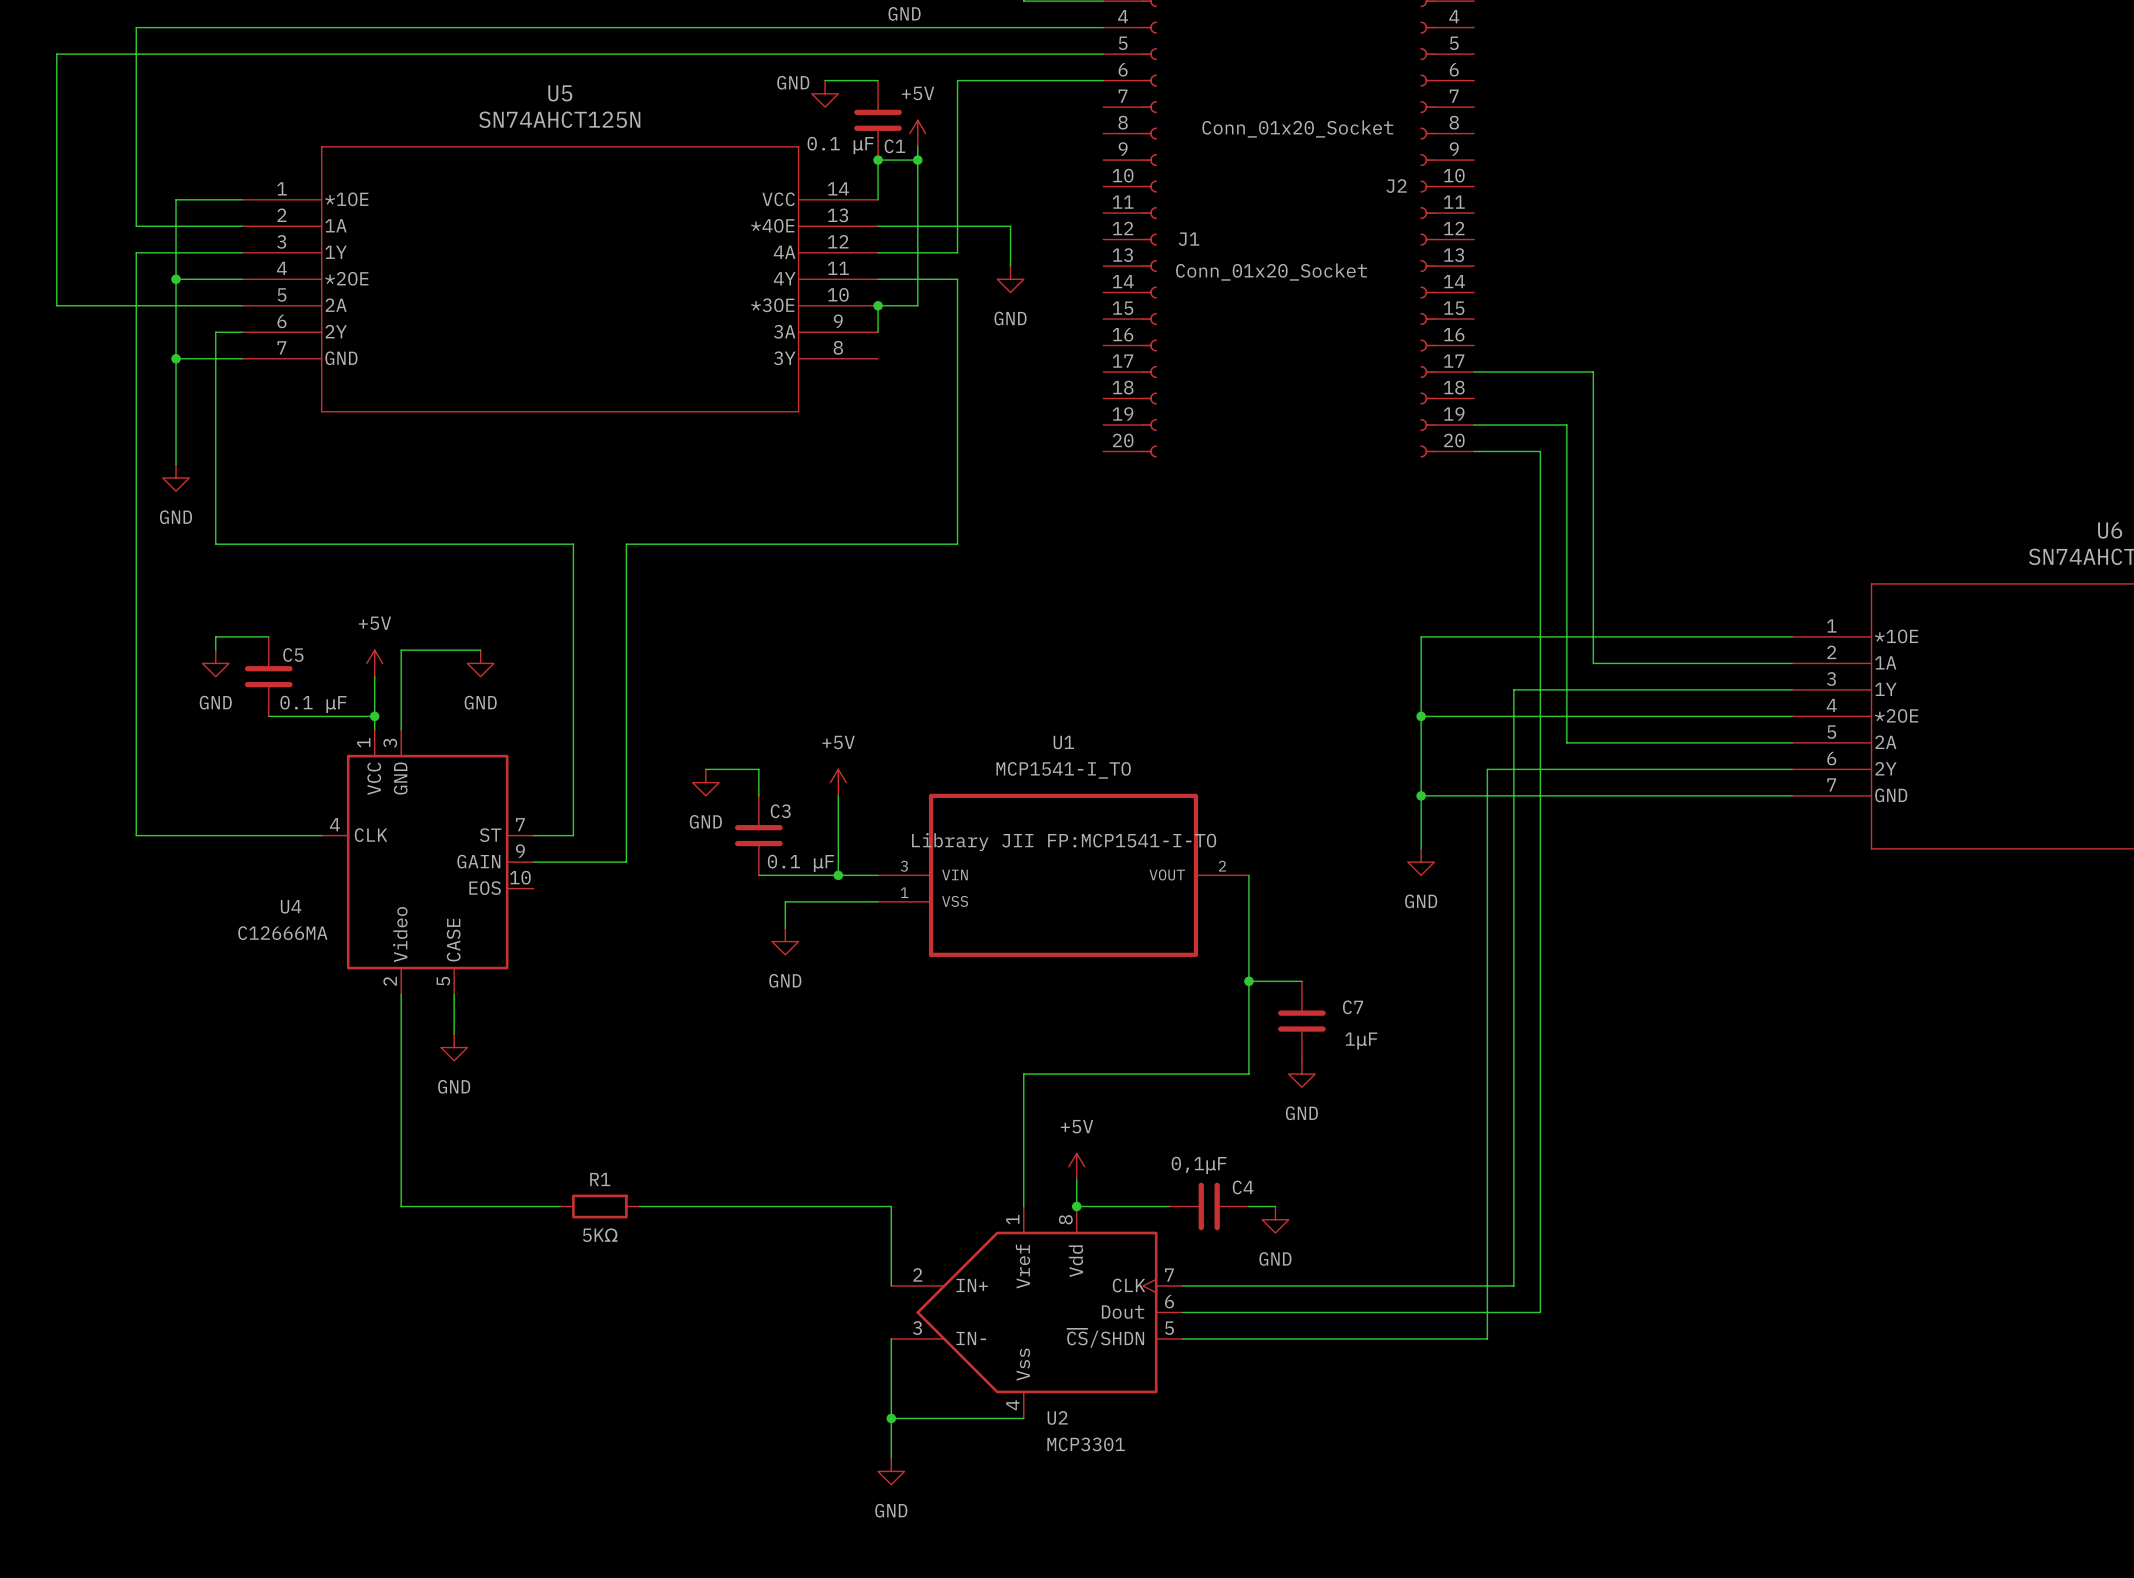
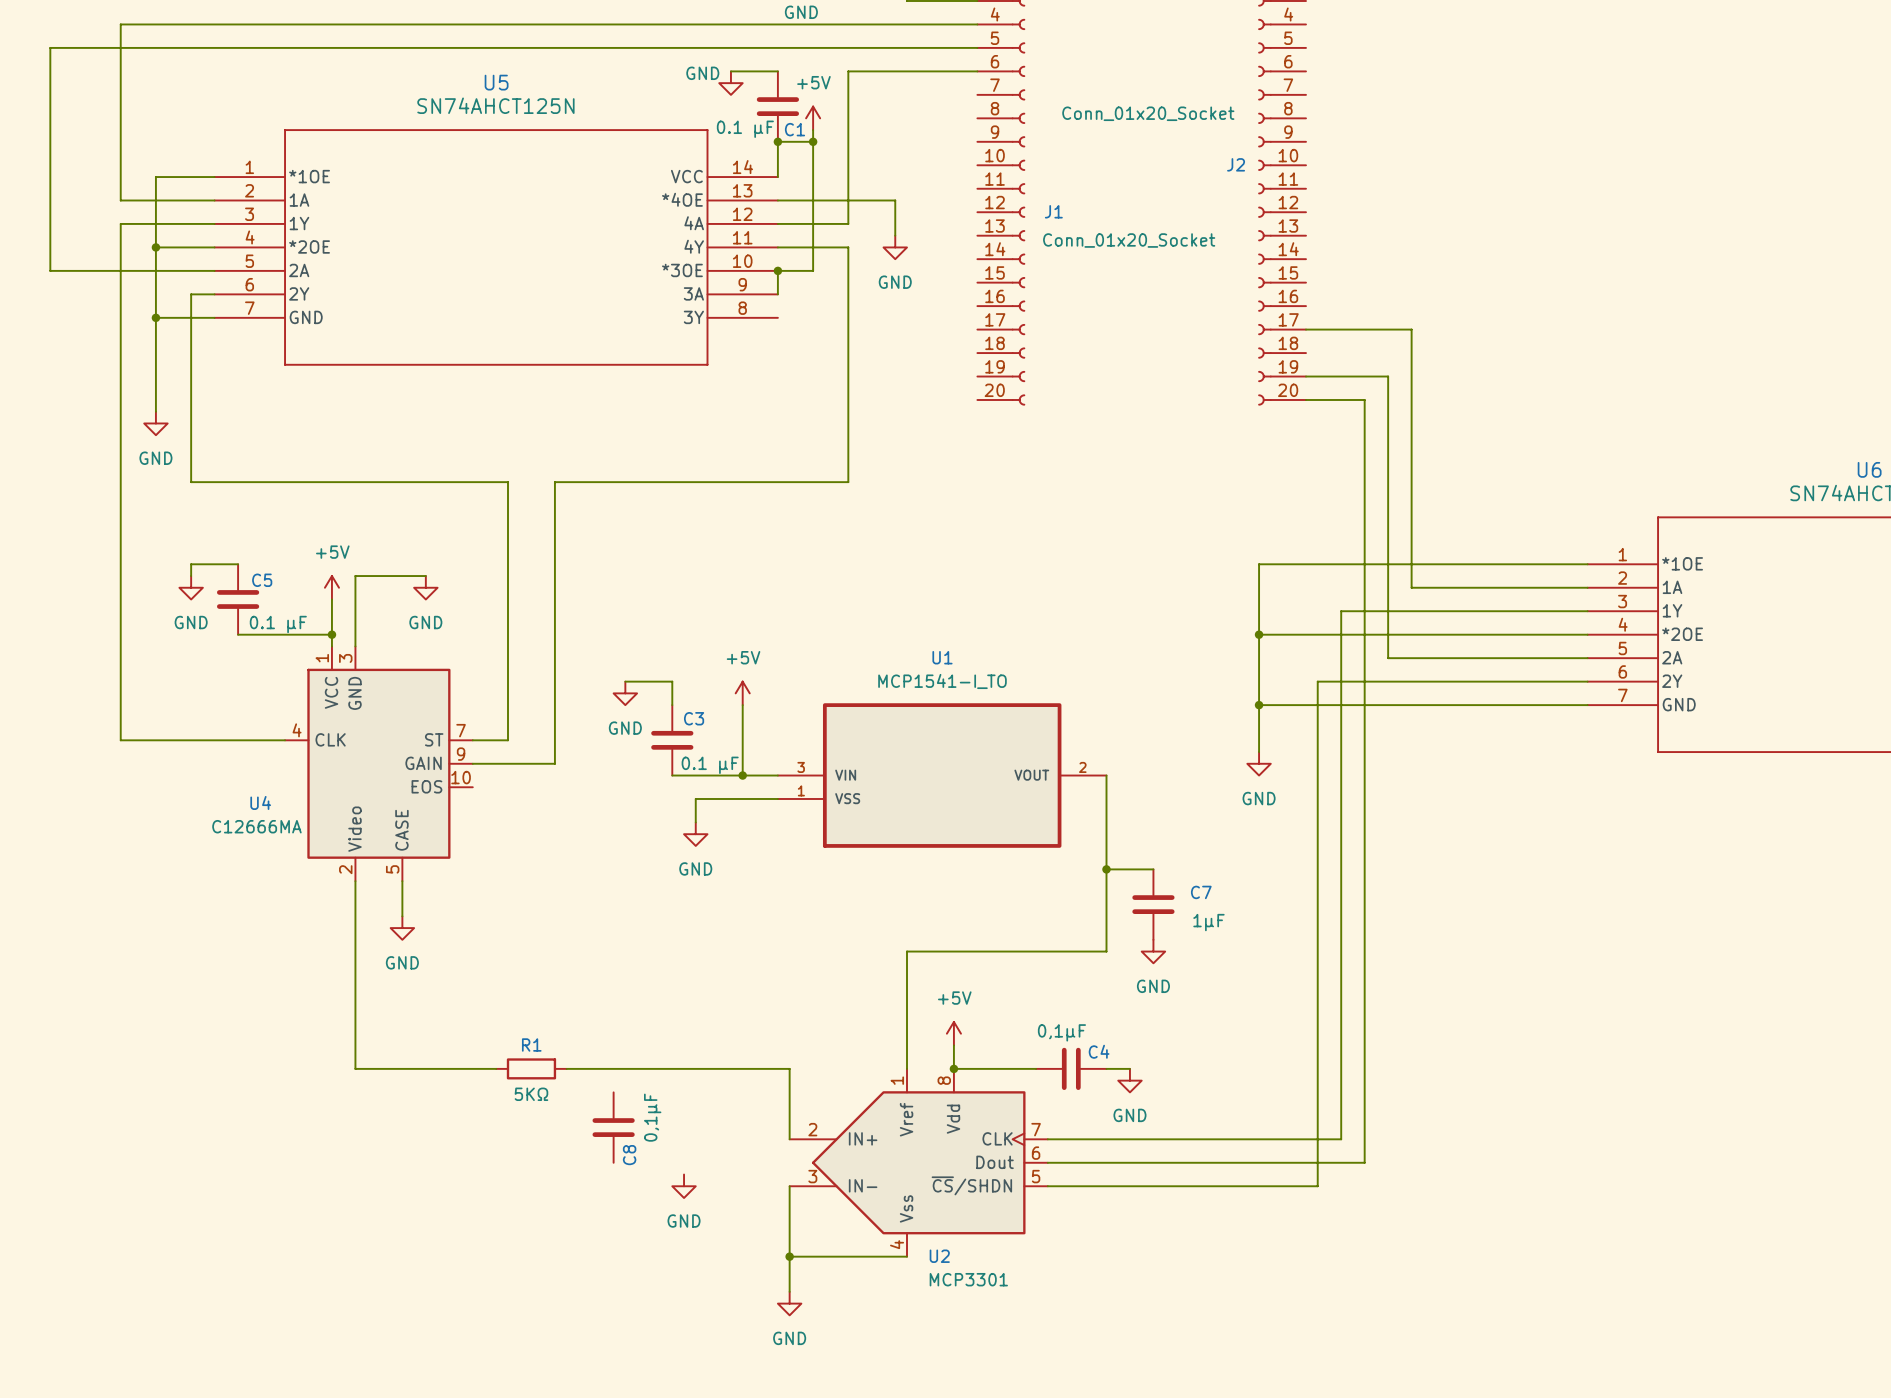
U1 text: Library JII FP:MCP1541-I-TO (1064, 842) -> none
C8: none -> 0,1μF (613, 1127)
power symbol: none -> GND (684, 1186)

